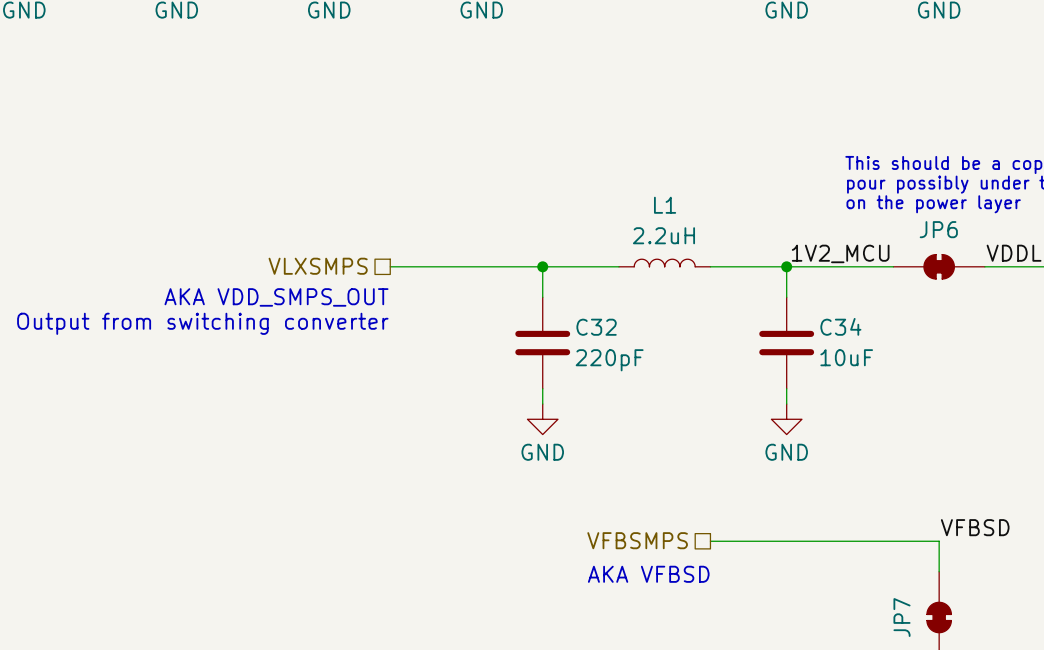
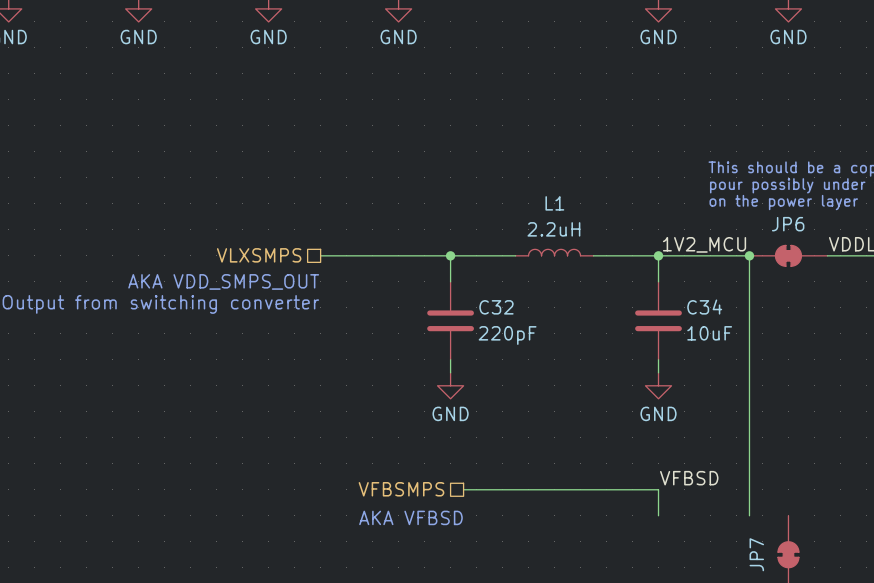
wire: none -> (749, 255) (749, 515)
junction: none -> (749, 255)
label position: VFBSD (975, 527) -> VFBSD (689, 478)
hierarchical label position: VFBSMPS (637, 540) -> VFBSMPS (401, 489)
wire: none -> (463, 489) (593, 489)
wire: (786, 541) (939, 541) (939, 571) -> (658, 489) (658, 515)
text position: AKA VFBSD (648, 574) -> AKA VFBSD (410, 517)

